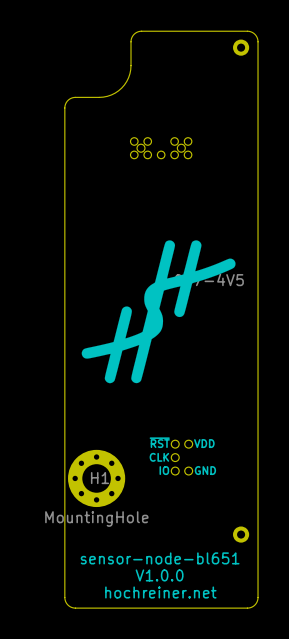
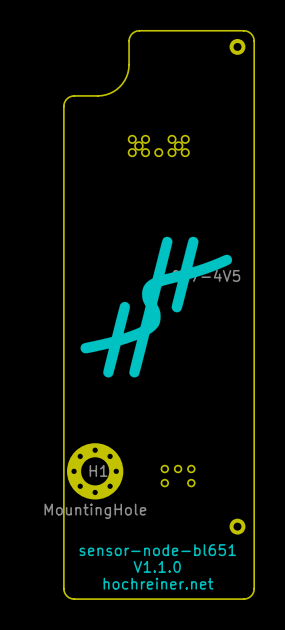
part: (181, 457) -> none
part: none -> (178, 476)
text: V1.0.0 (159, 575) -> V1.1.0 (157, 566)

